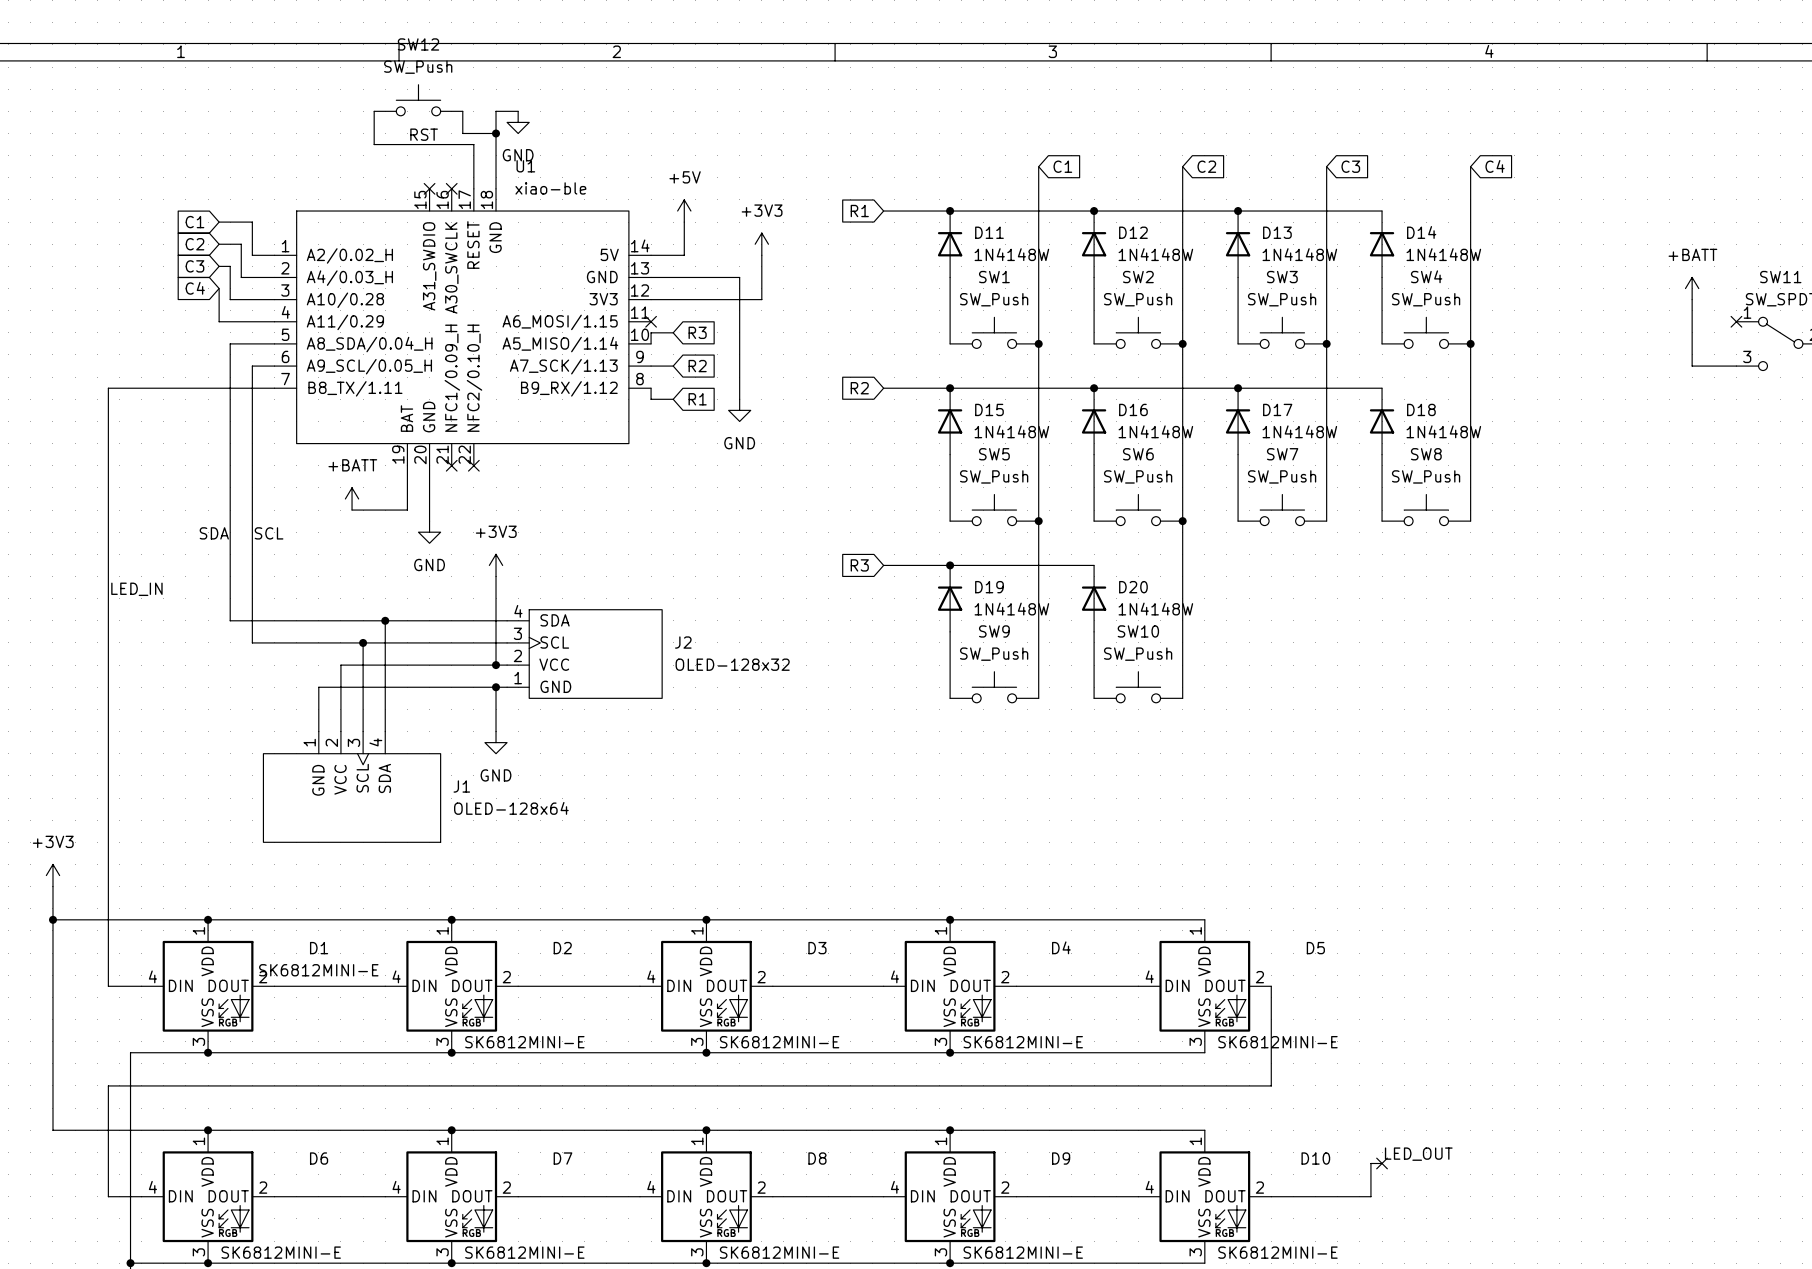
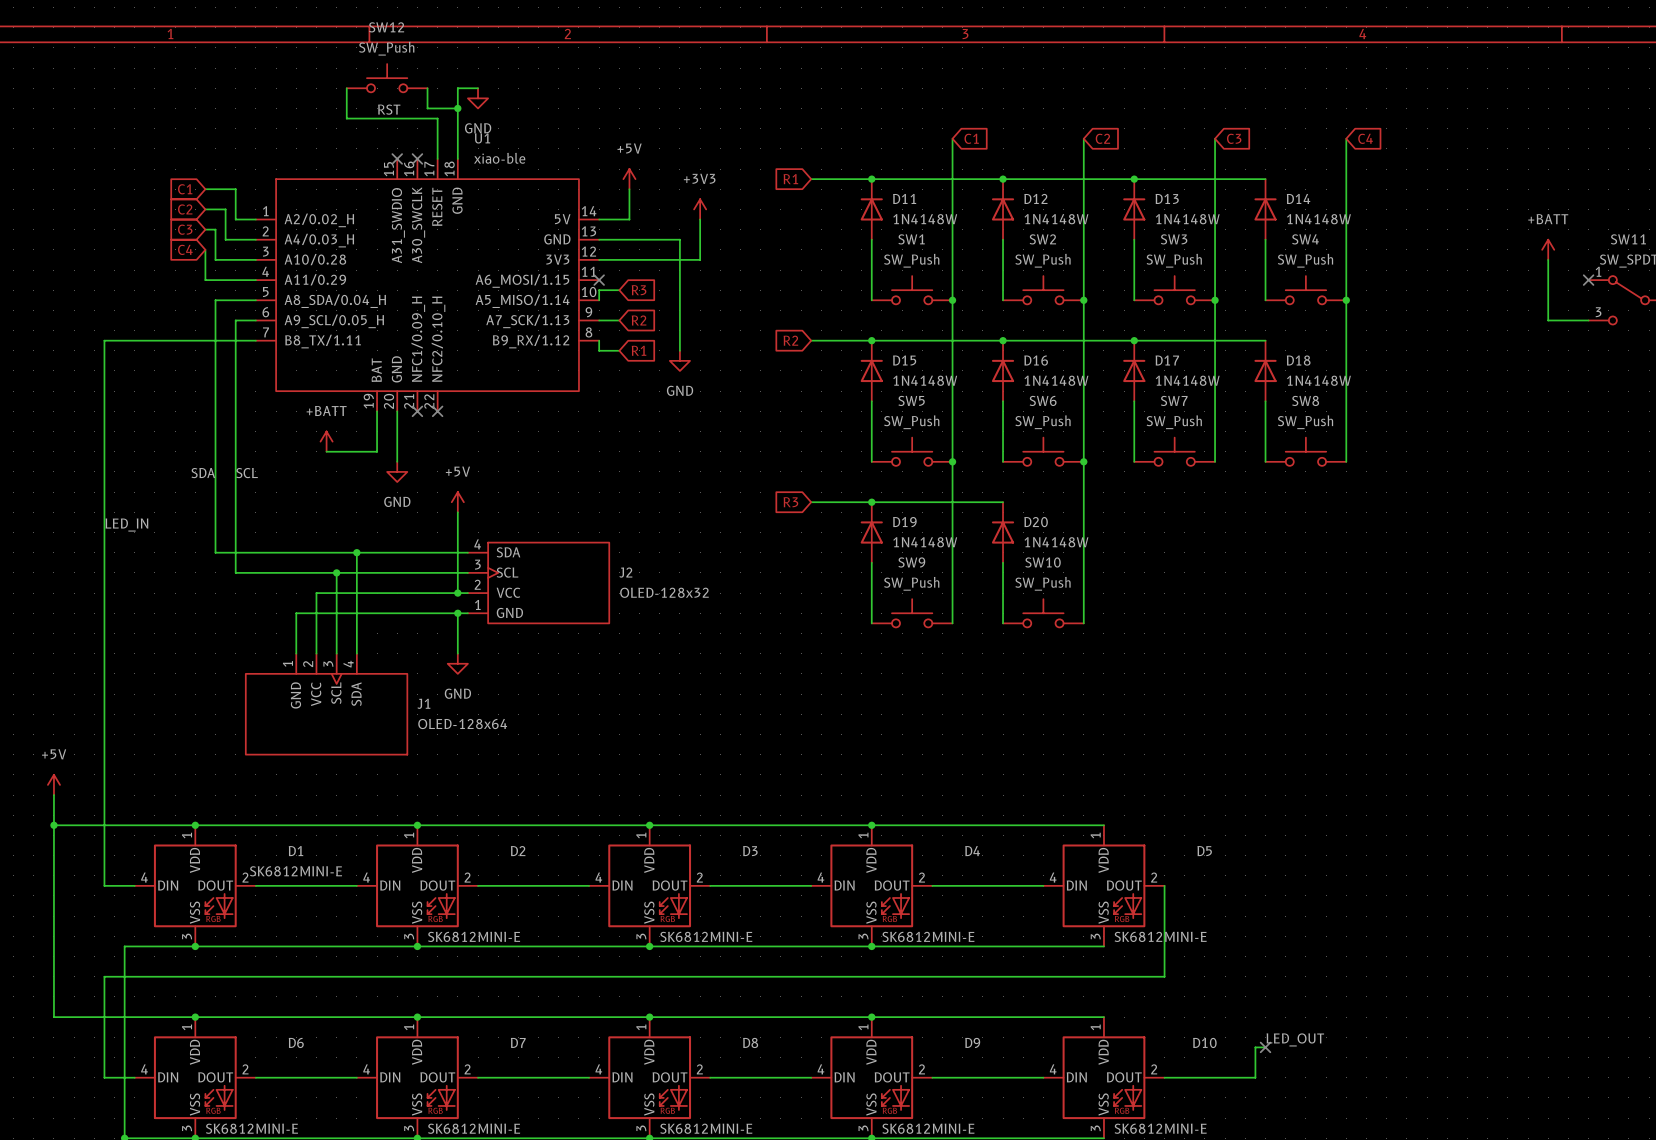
power symbol: +3V3 (496, 565) -> +5V (457, 502)
power symbol: +3V3 (52, 875) -> +5V (53, 784)

